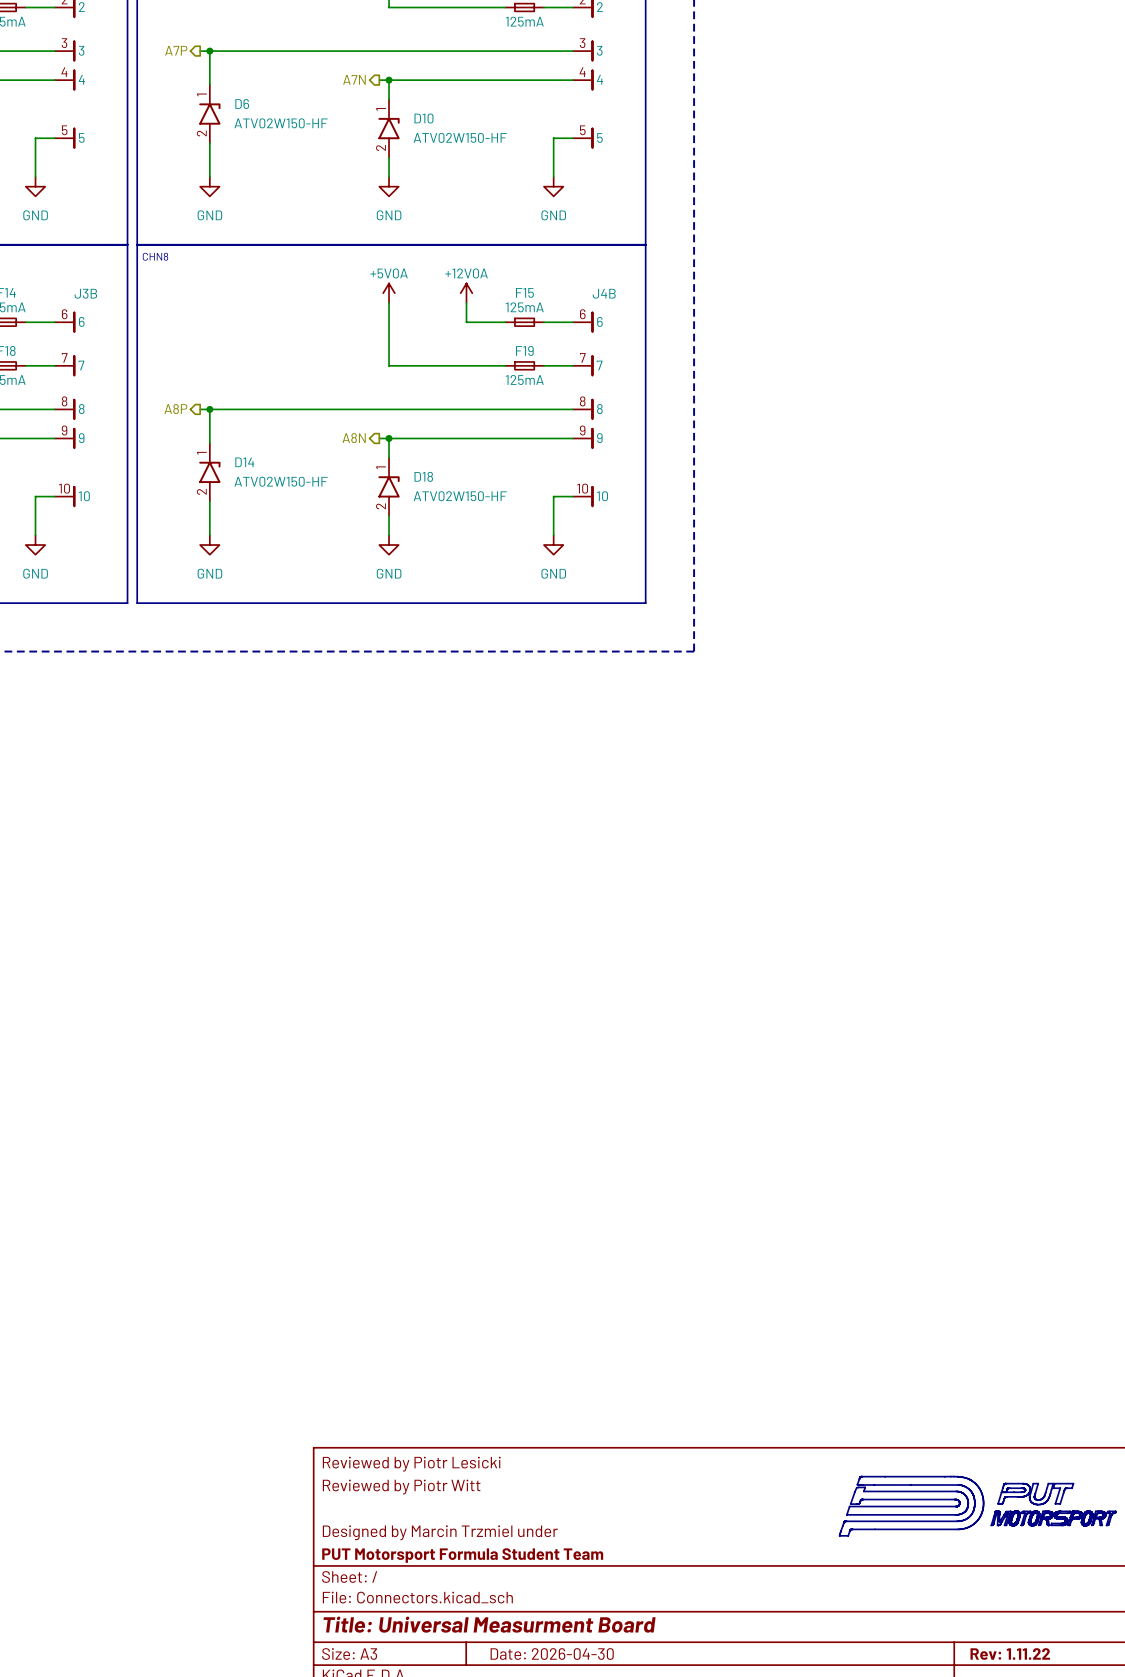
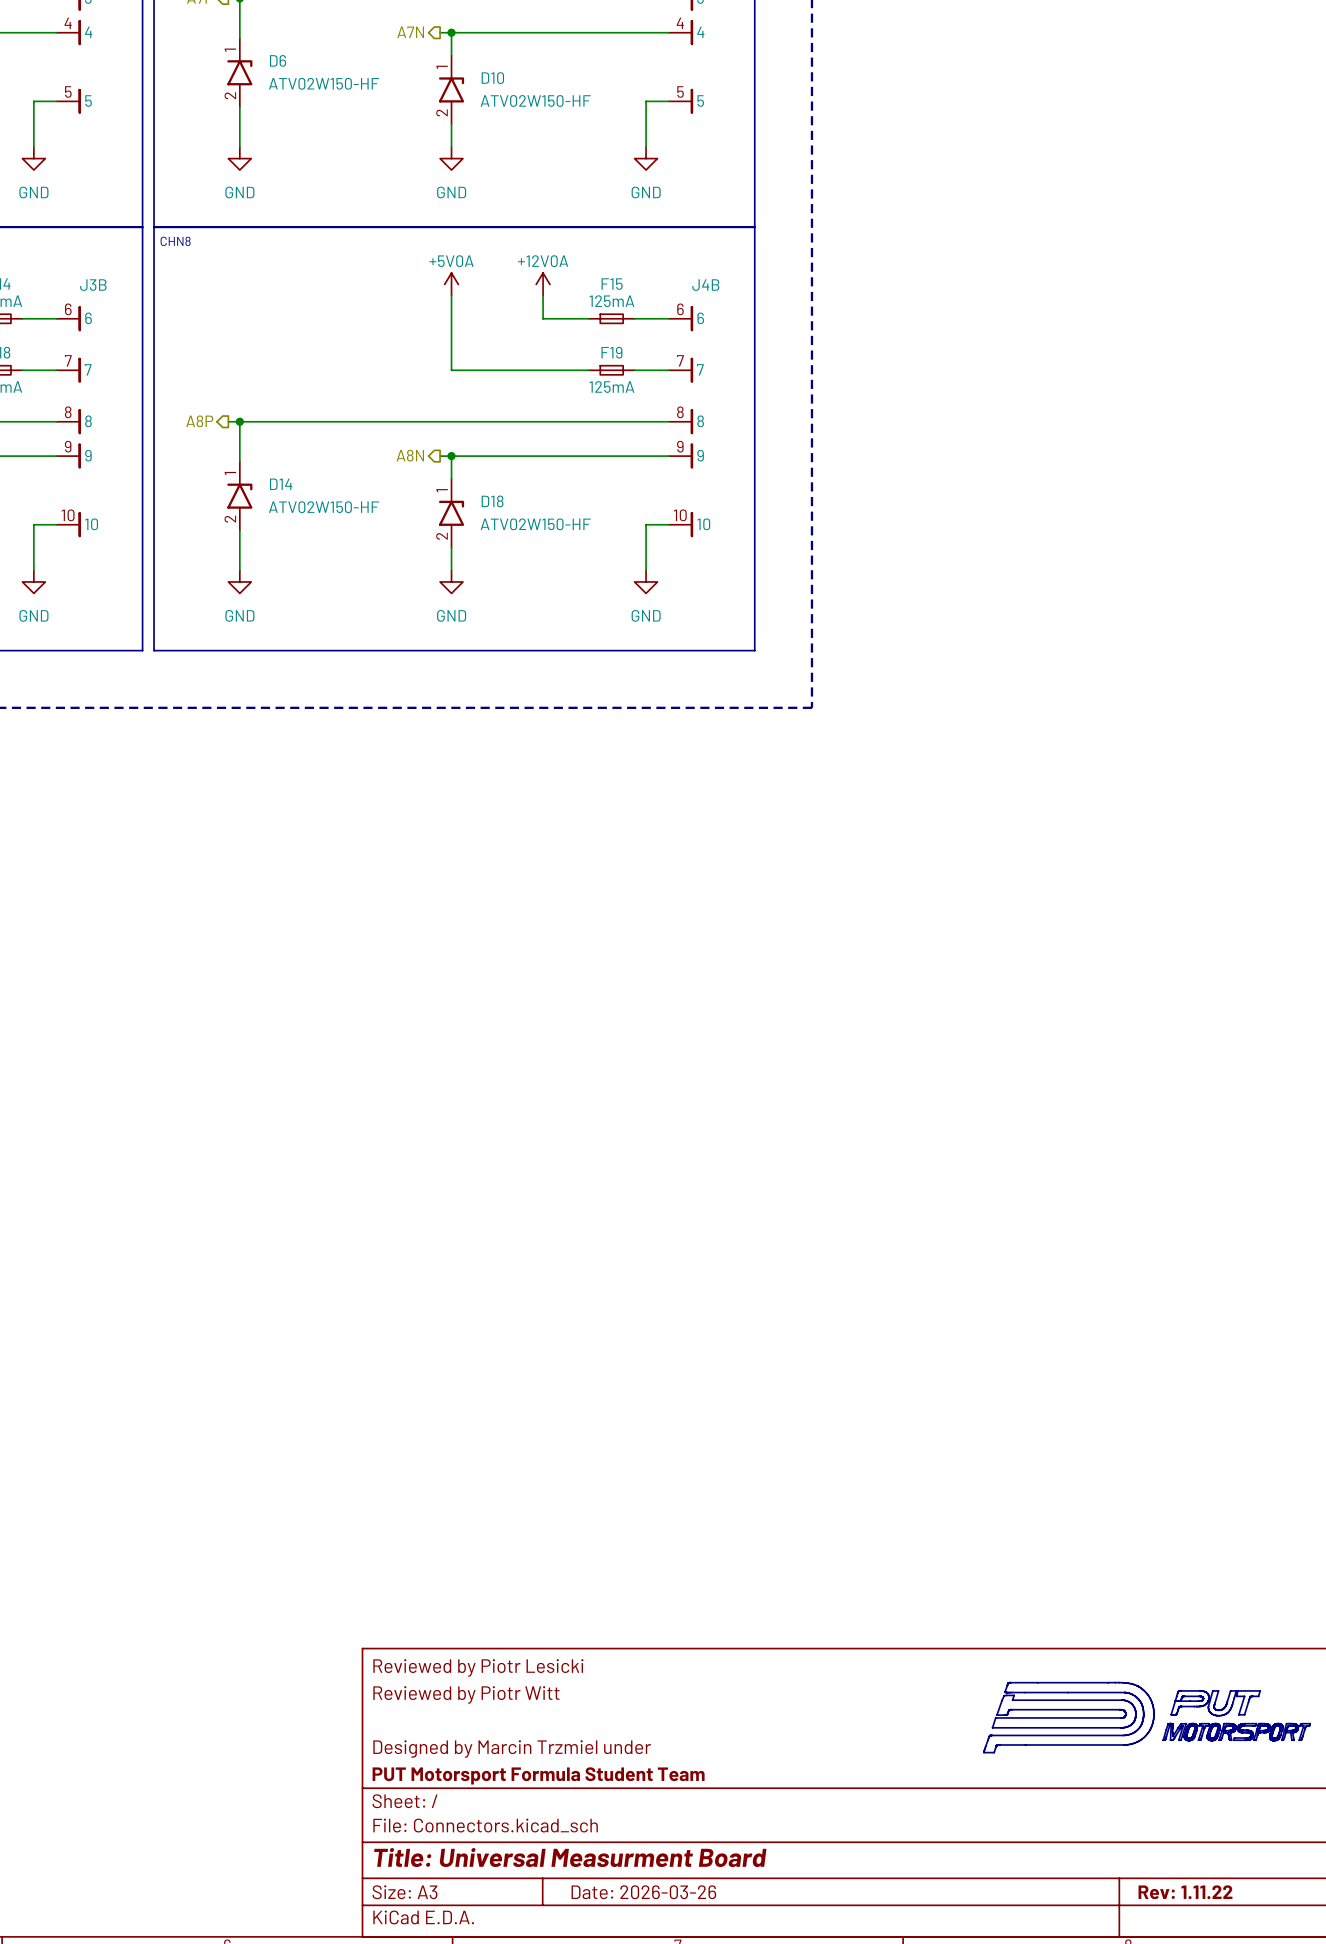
title block: Date: 2026-04-30 (552, 1654) -> Date: 2026-03-26 (643, 1892)

